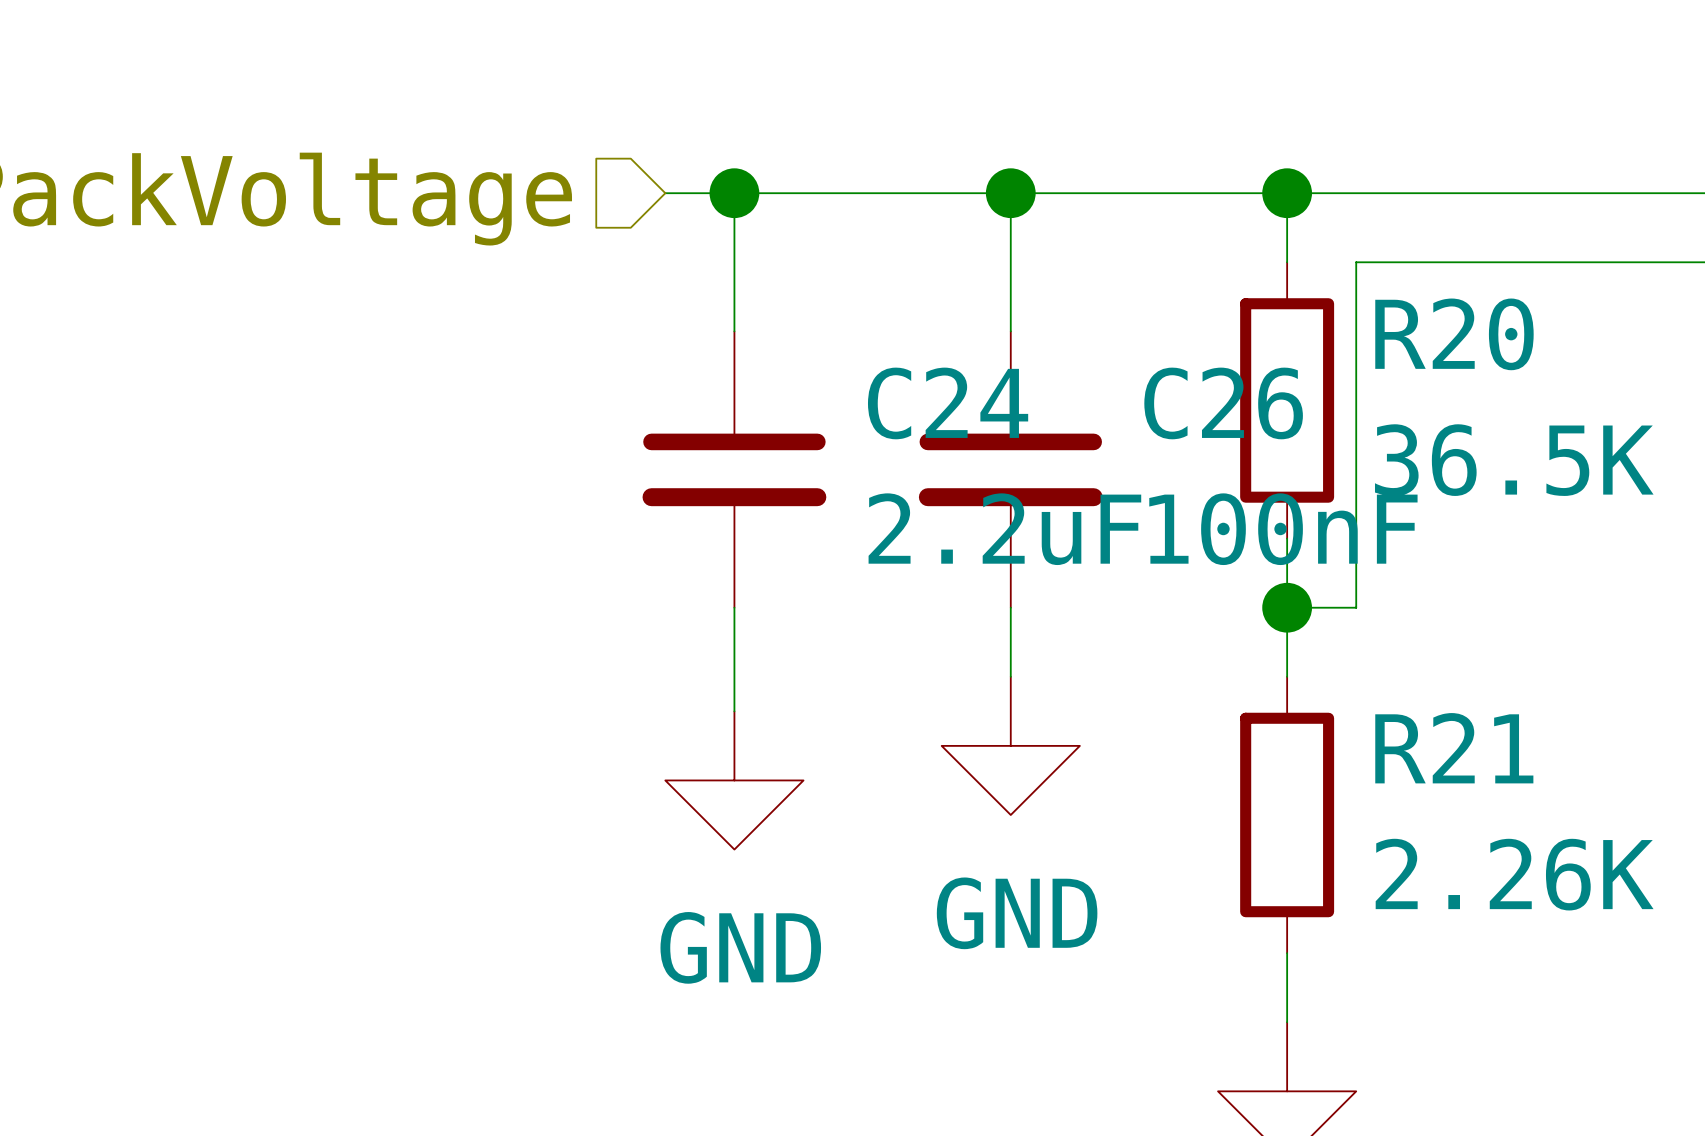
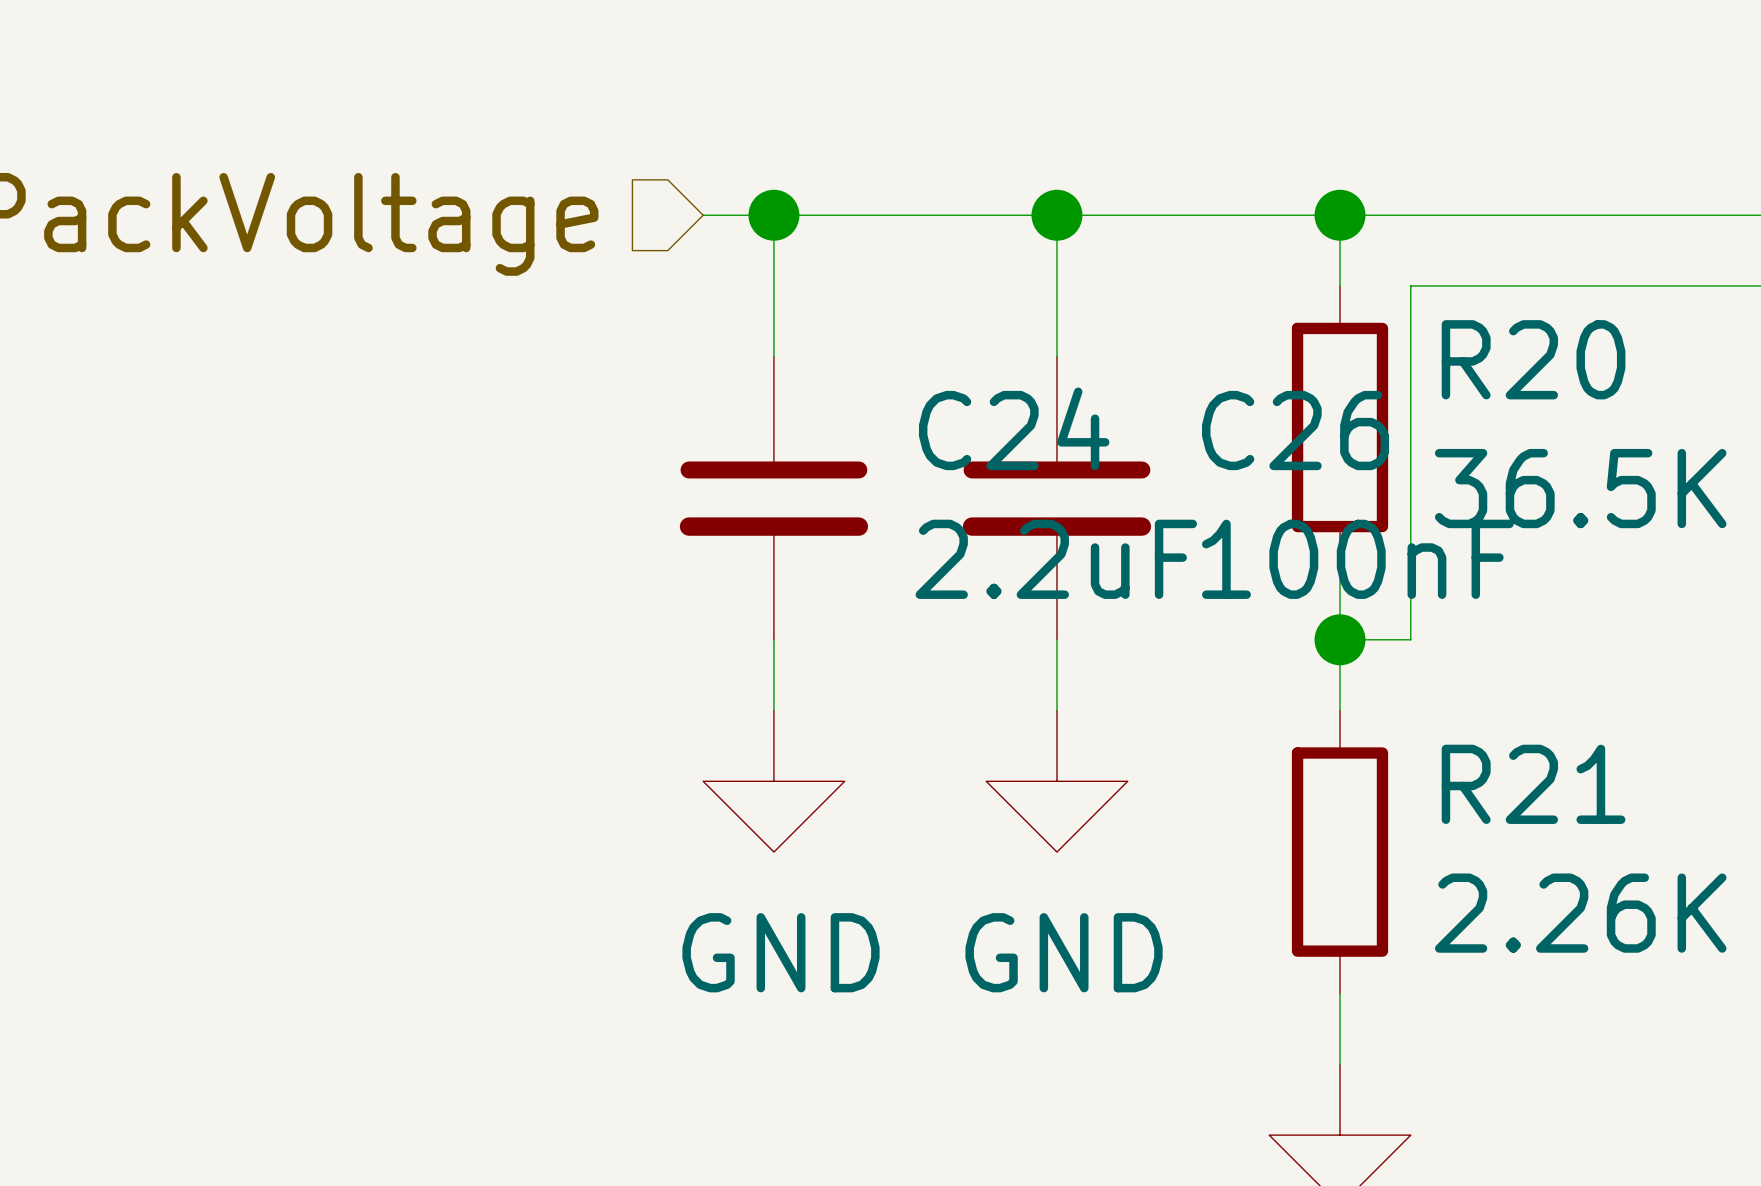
power symbol position: GND (734, 780) -> GND (773, 781)

